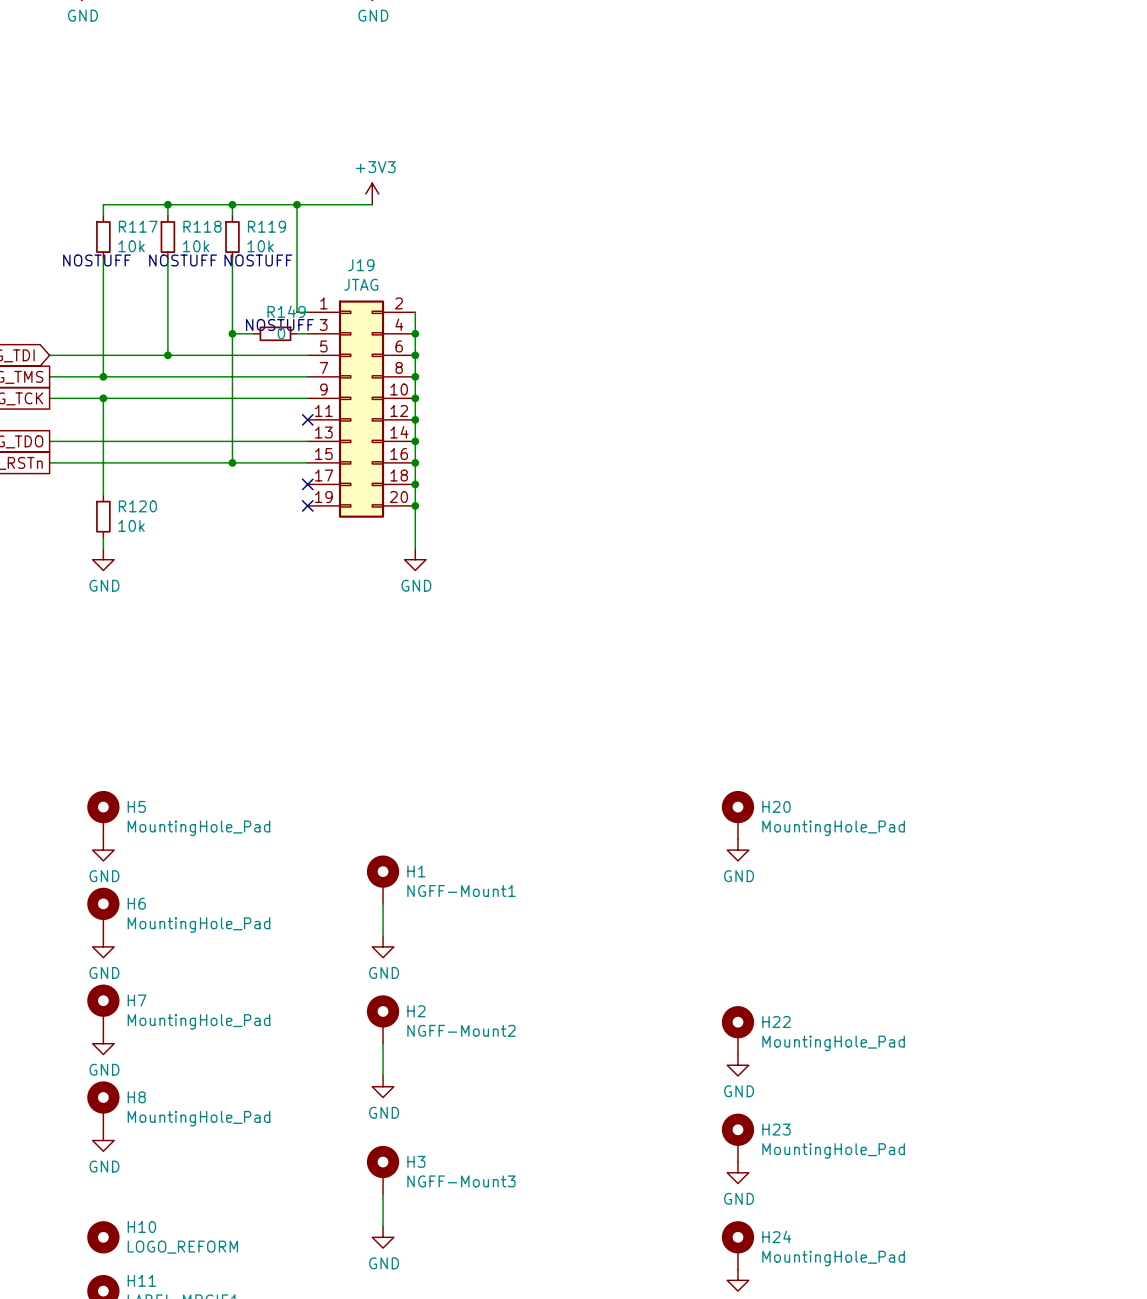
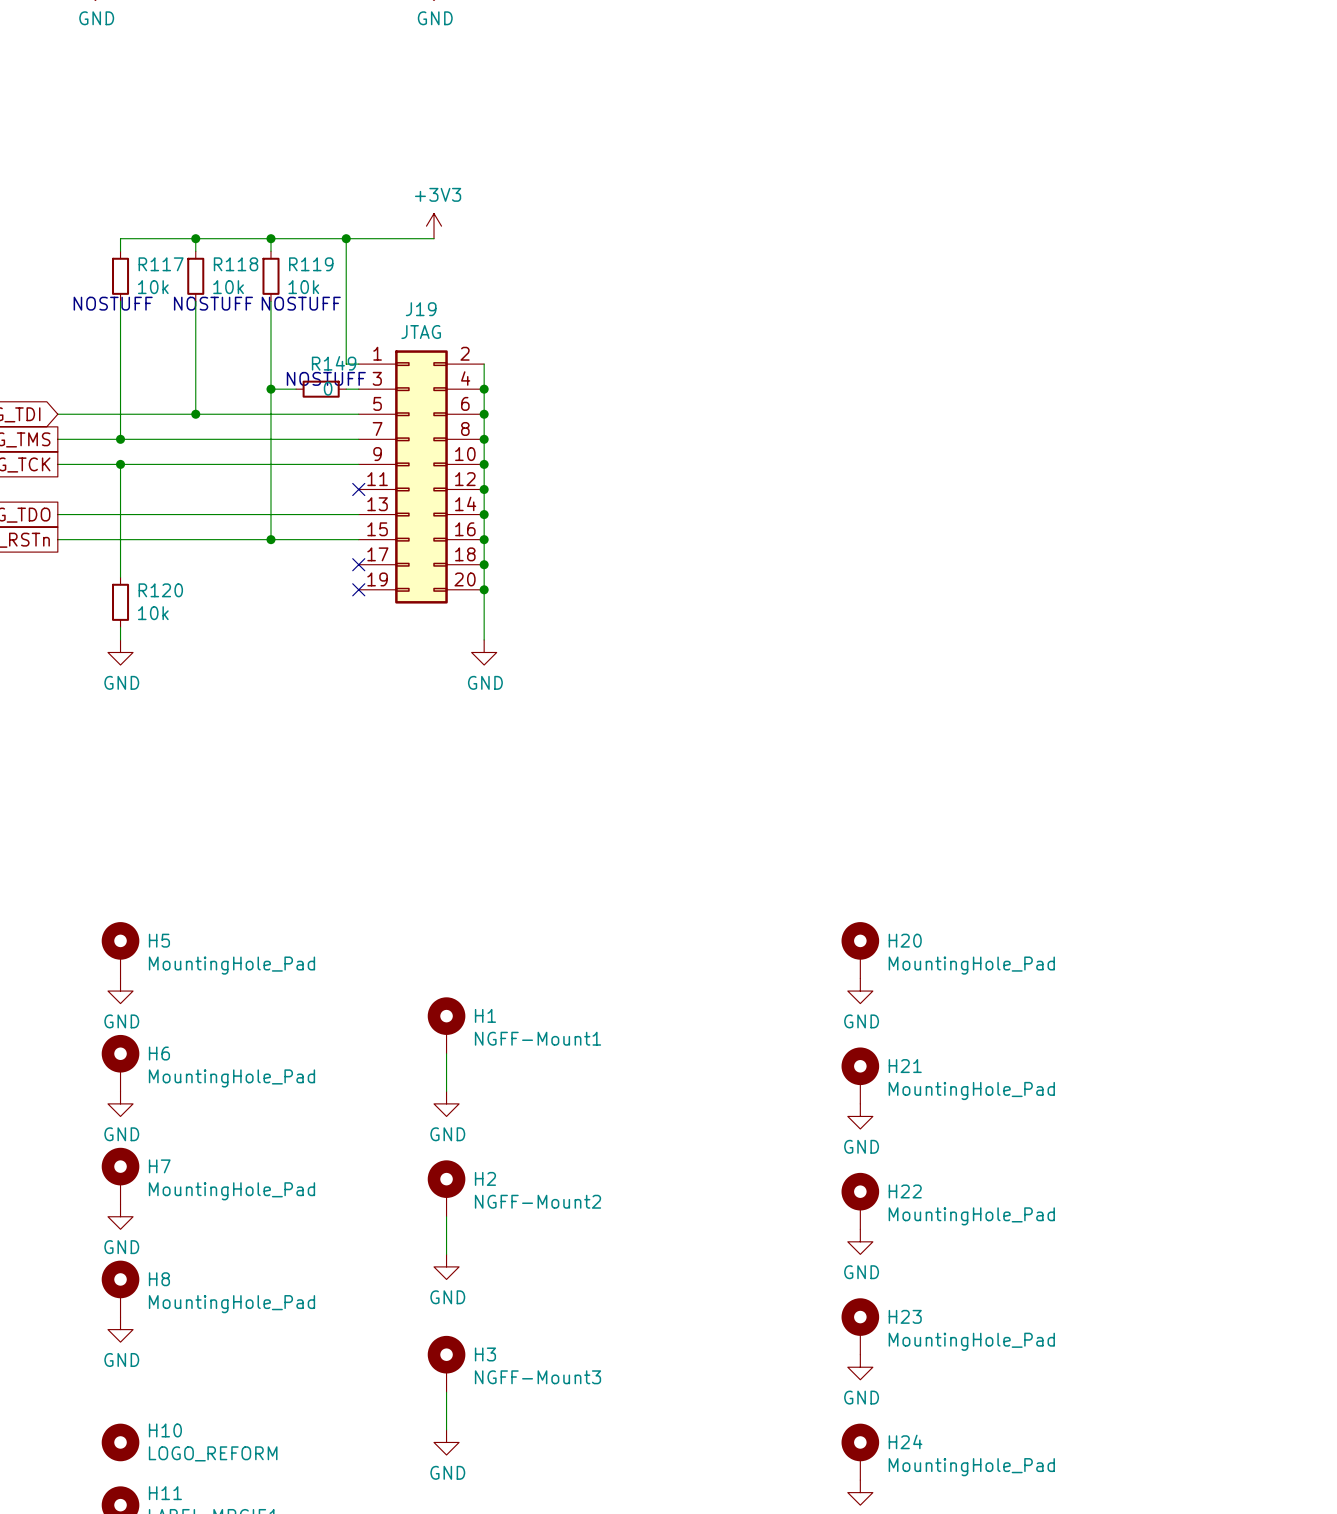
H21: none -> MountingHole_Pad (860, 1075)
power symbol: none -> GND (860, 1116)

